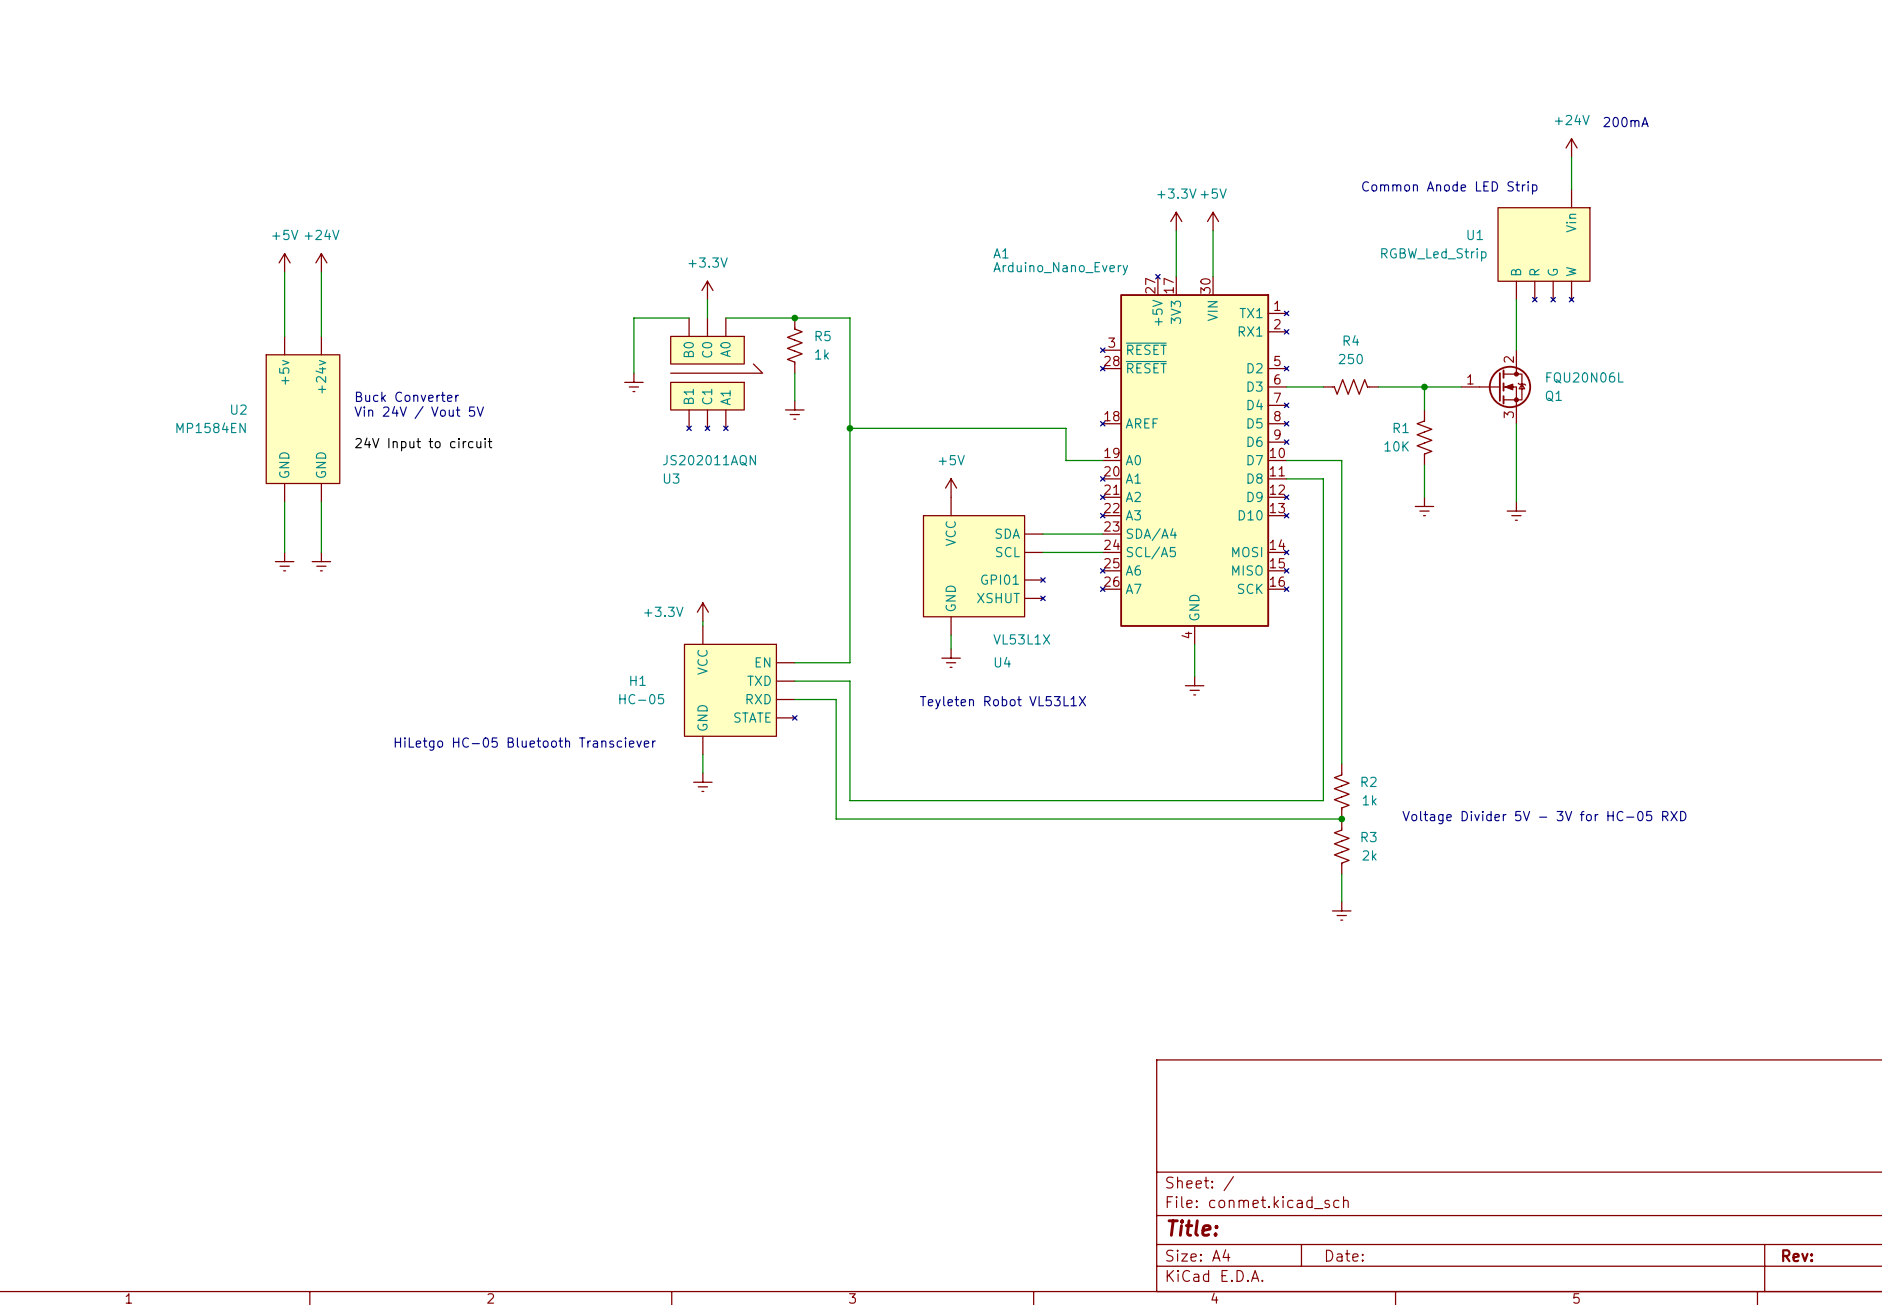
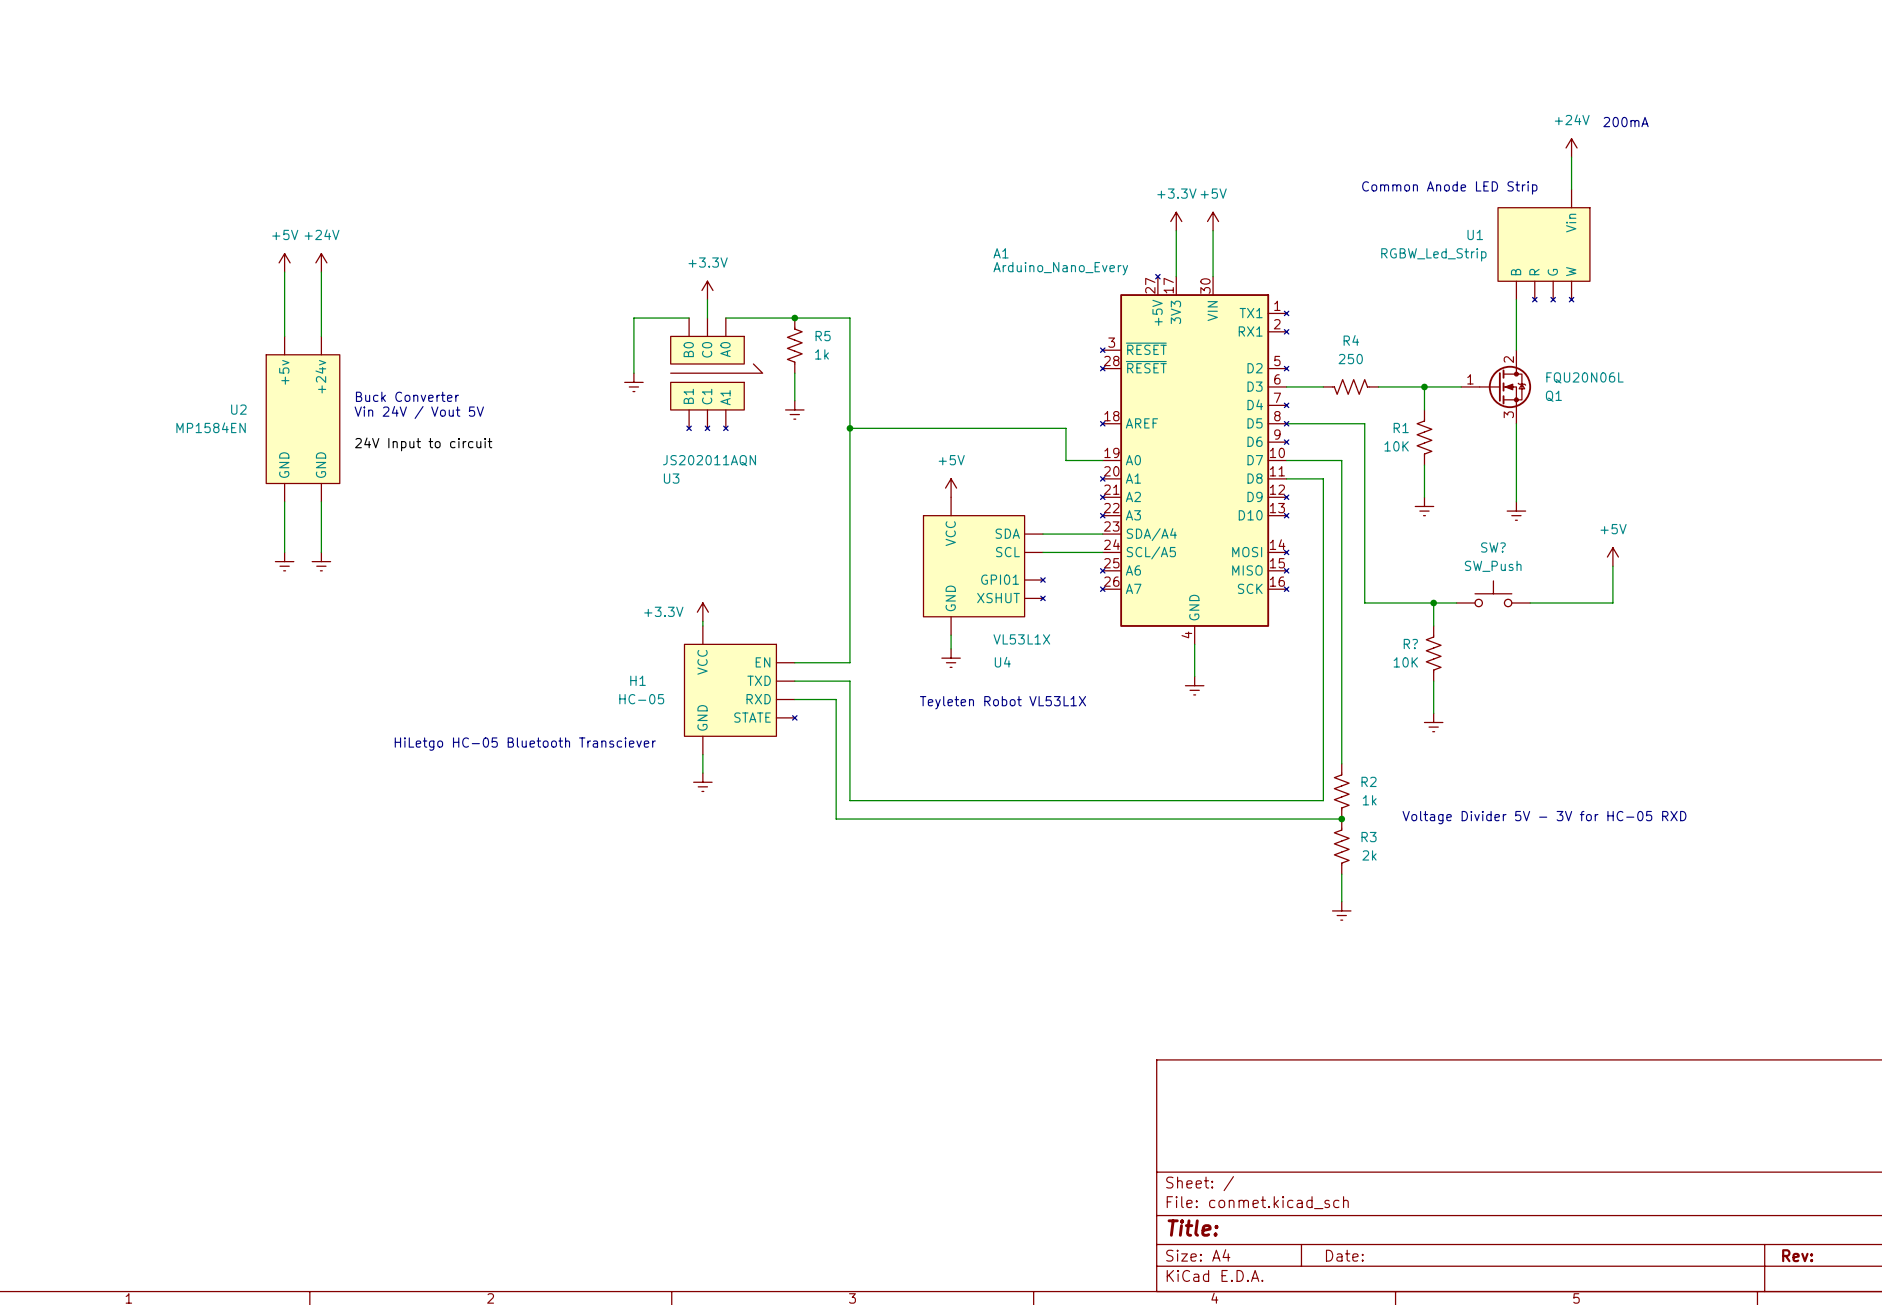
wire: none -> (1286, 423) (1364, 423) (1364, 602) (1456, 602)
power symbol: none -> +5V (1612, 557)
wire: none -> (1612, 566) (1612, 602) (1530, 602)
SW?: none -> SW_Push (1493, 593)
wire: none -> (1433, 602) (1433, 625)
junction: none -> (1433, 602)
R?: none -> 10K (1433, 653)
wire: none -> (1433, 681) (1433, 713)
power symbol: none -> (1433, 722)

